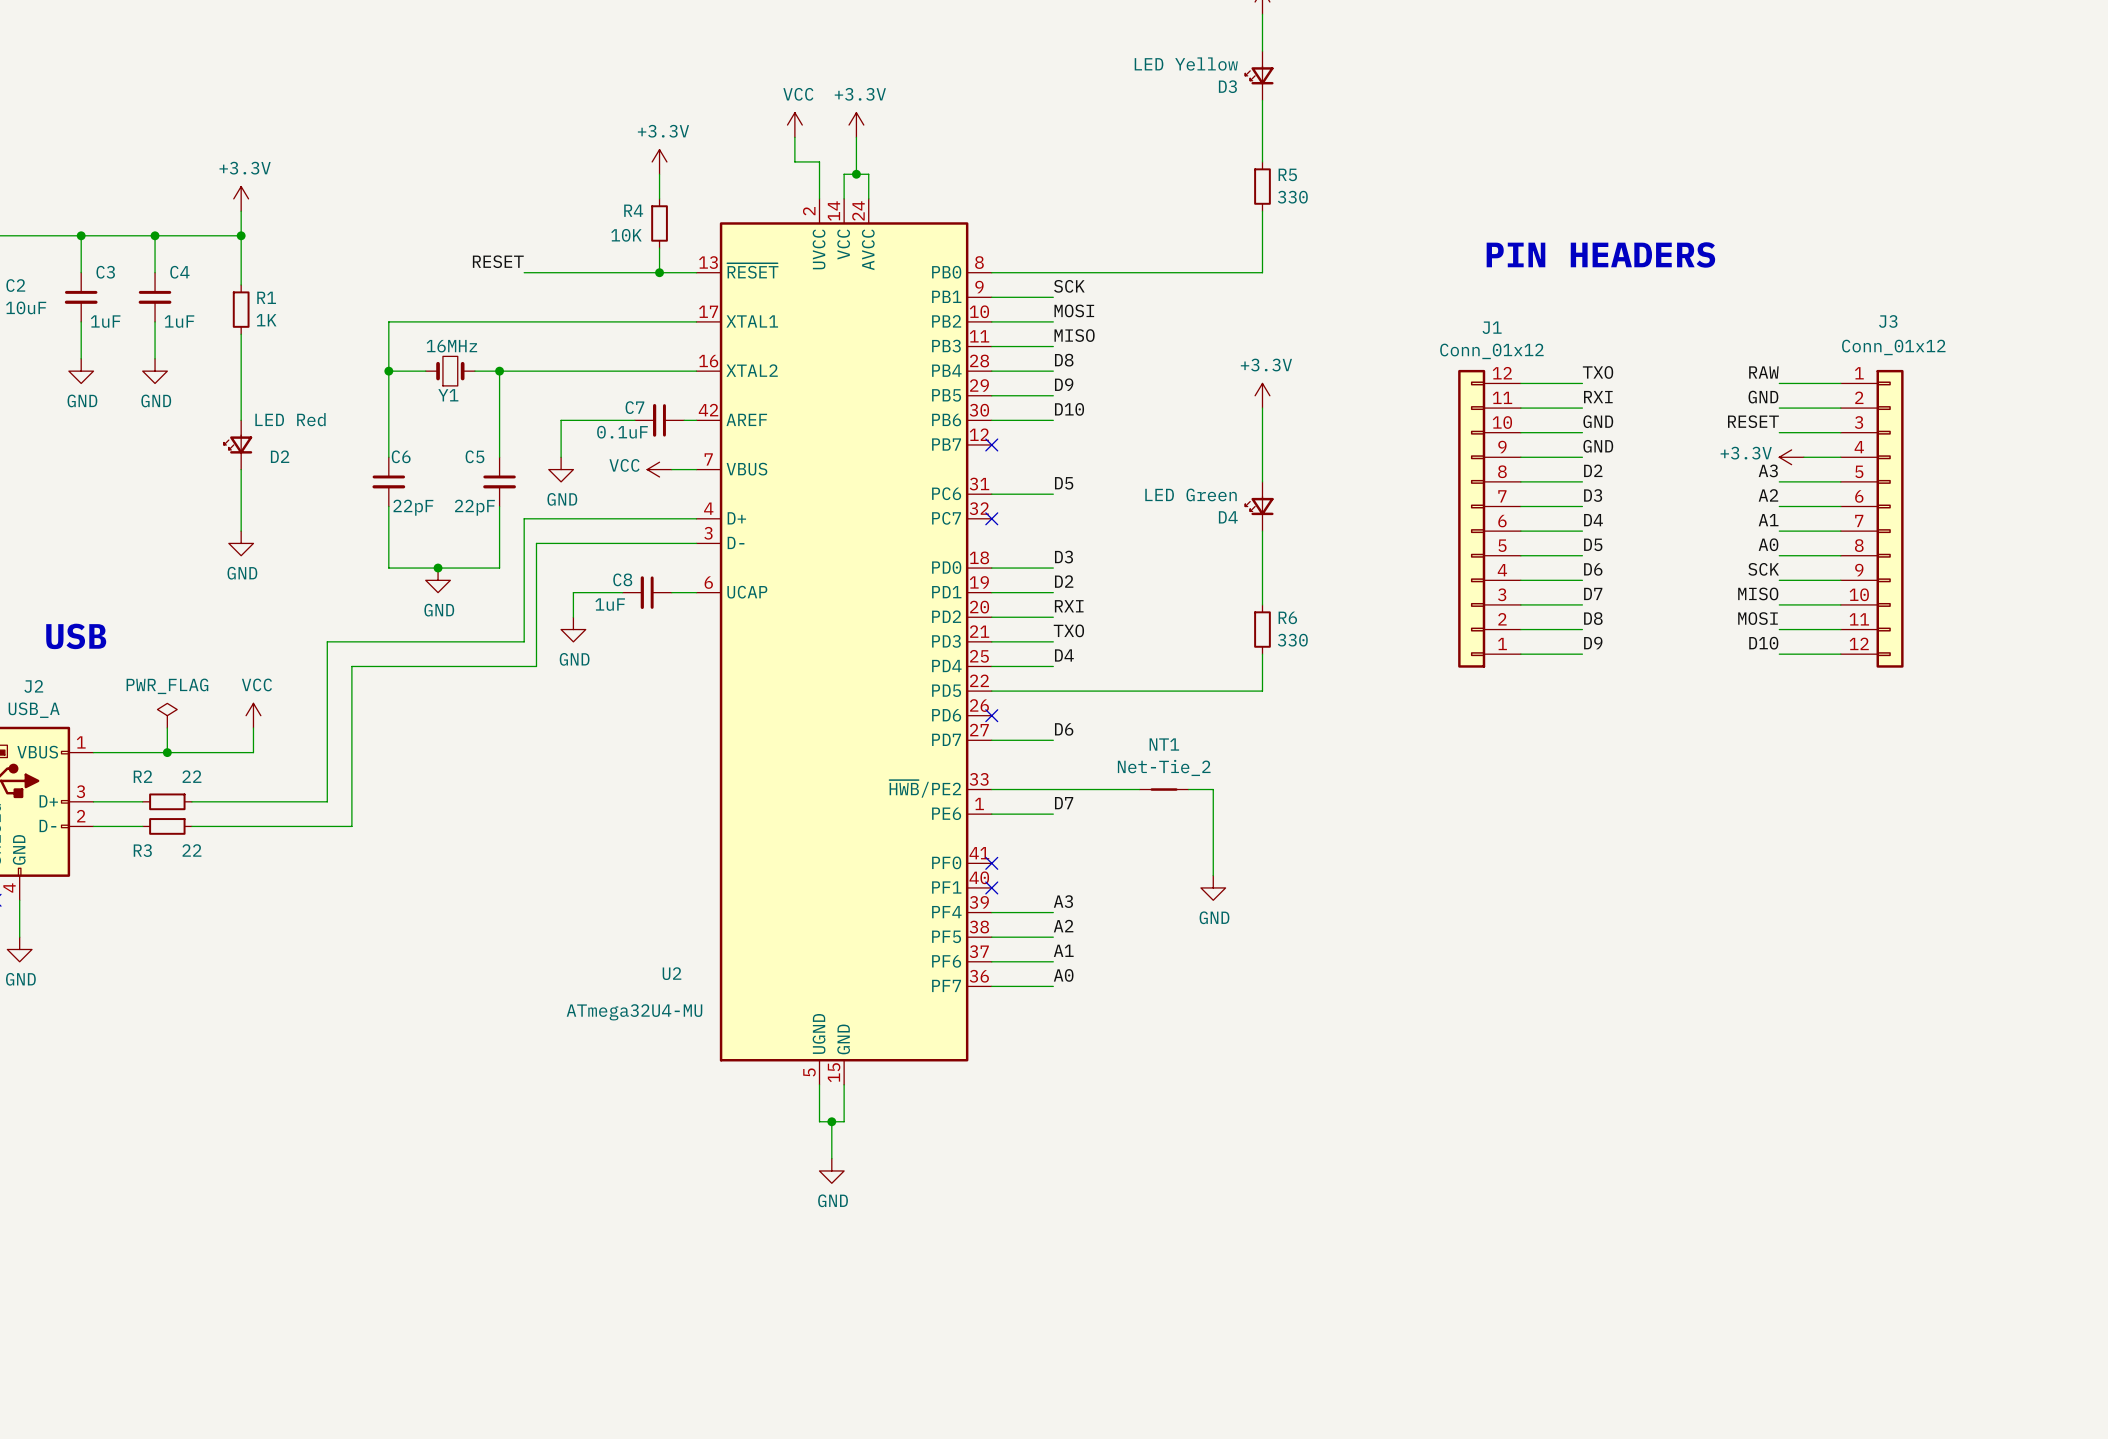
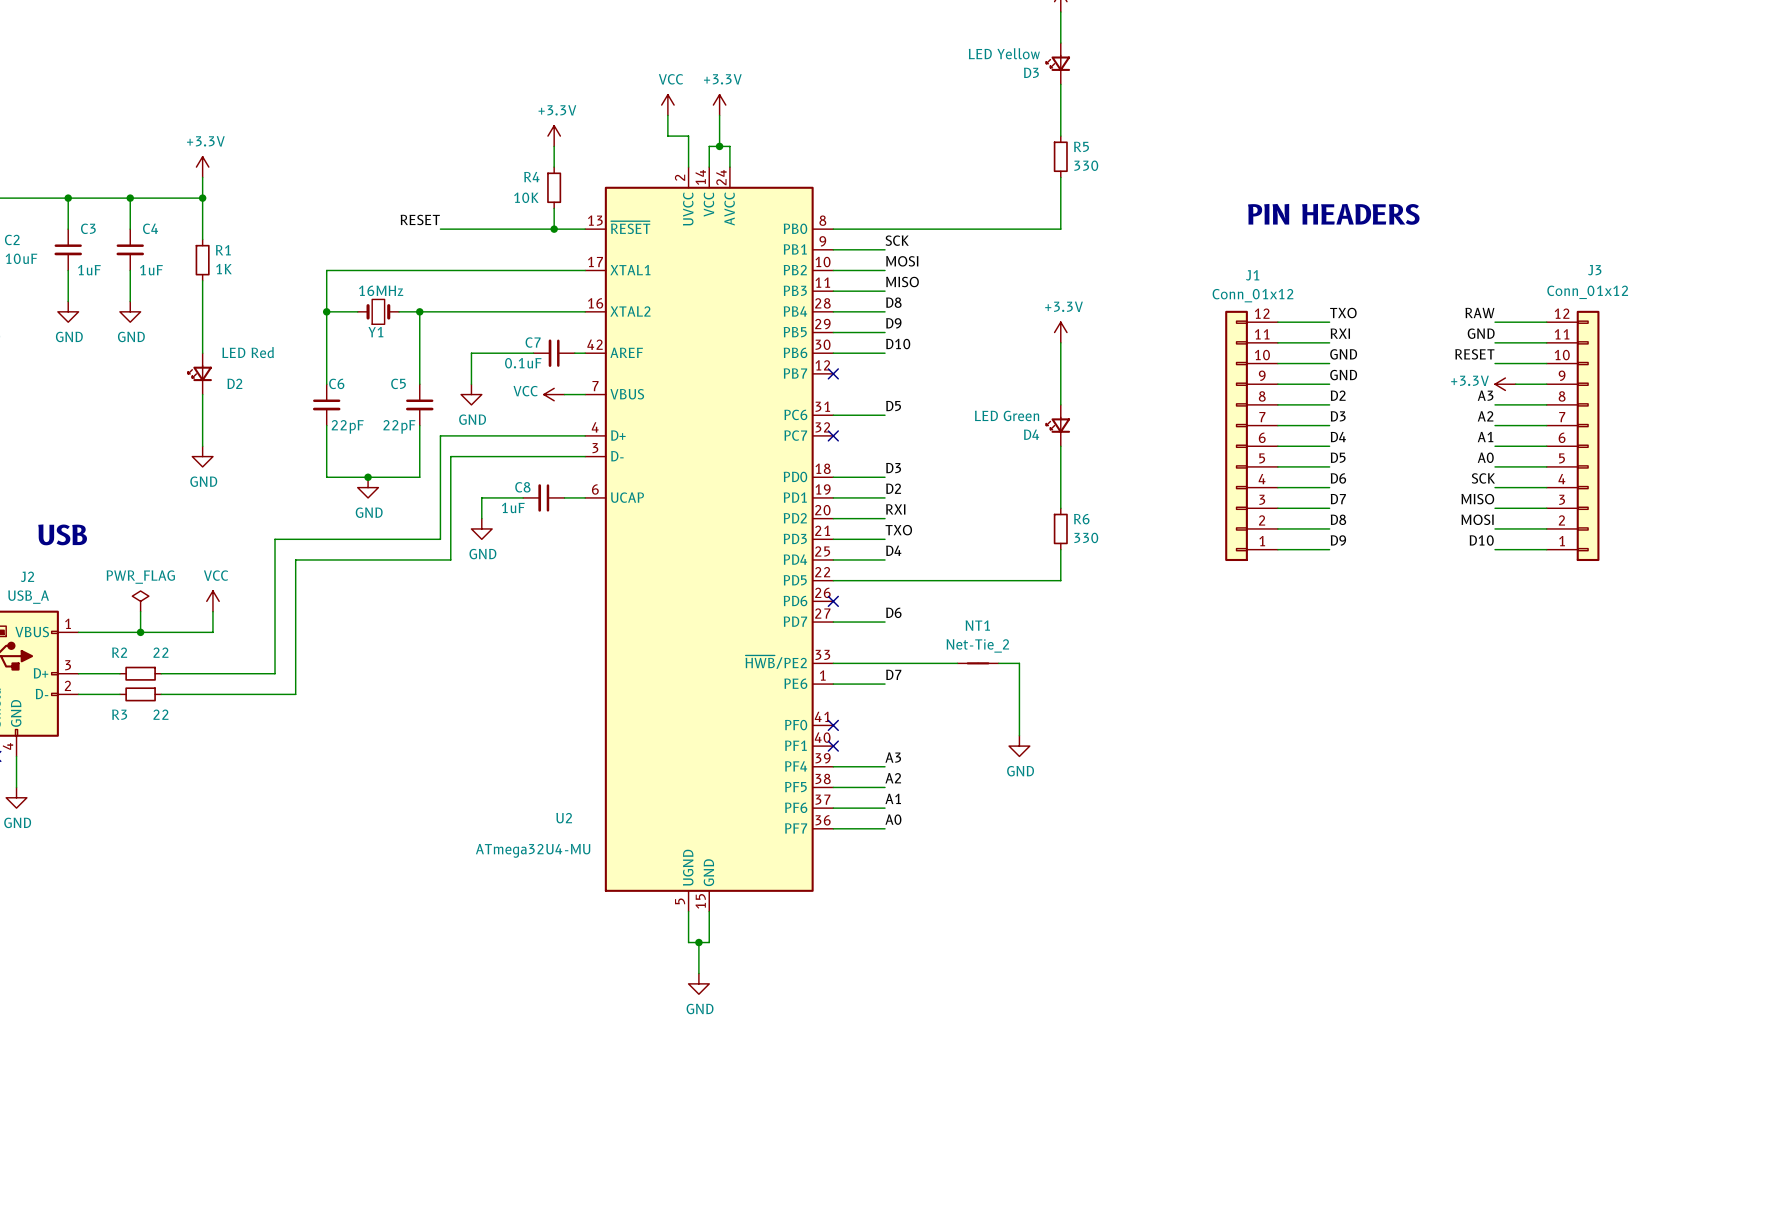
J3 flip: as is (1890, 518) -> up-down (1588, 435)

